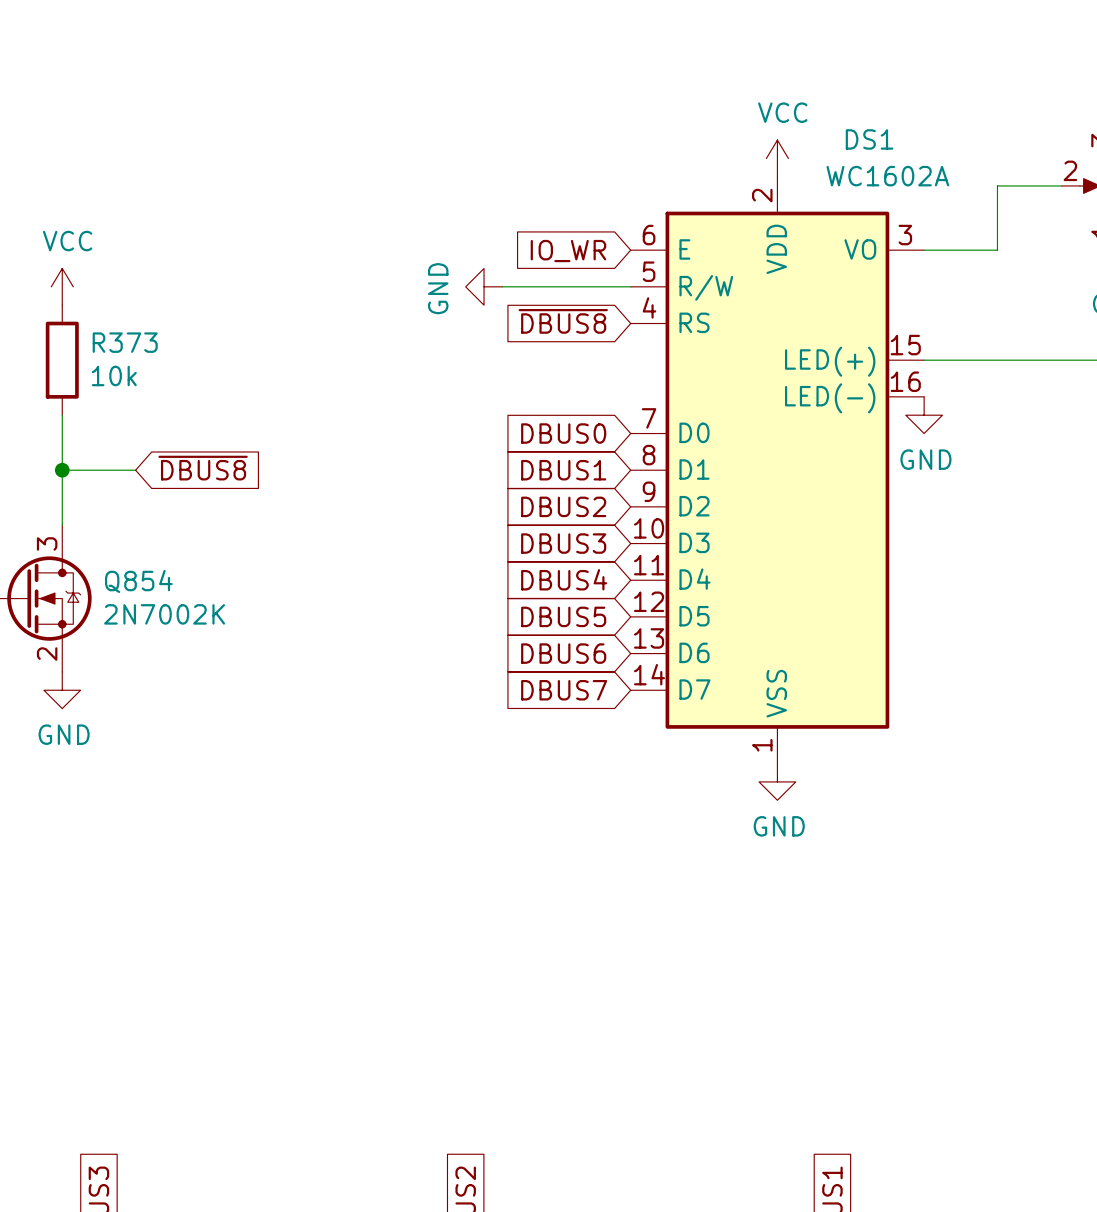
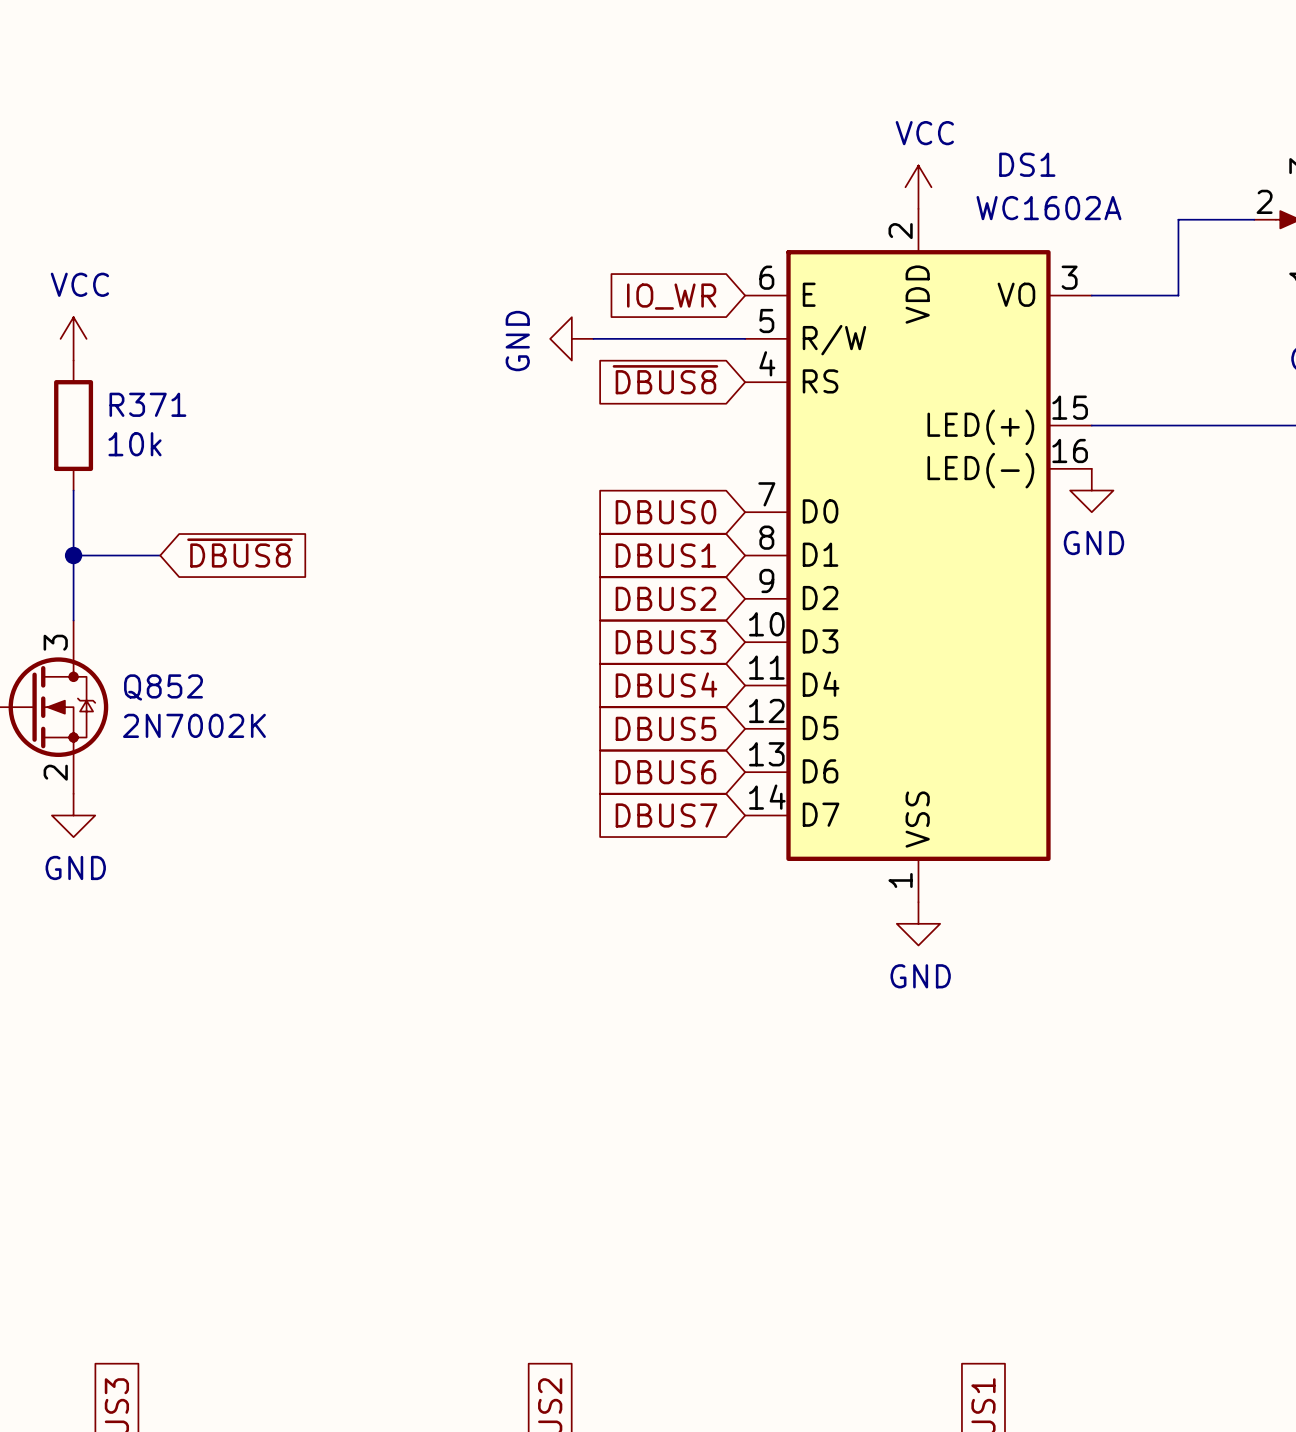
R373 name: R373 (125, 342) -> R371 (147, 404)
Q854 name: Q854 (138, 581) -> Q852 (163, 687)

